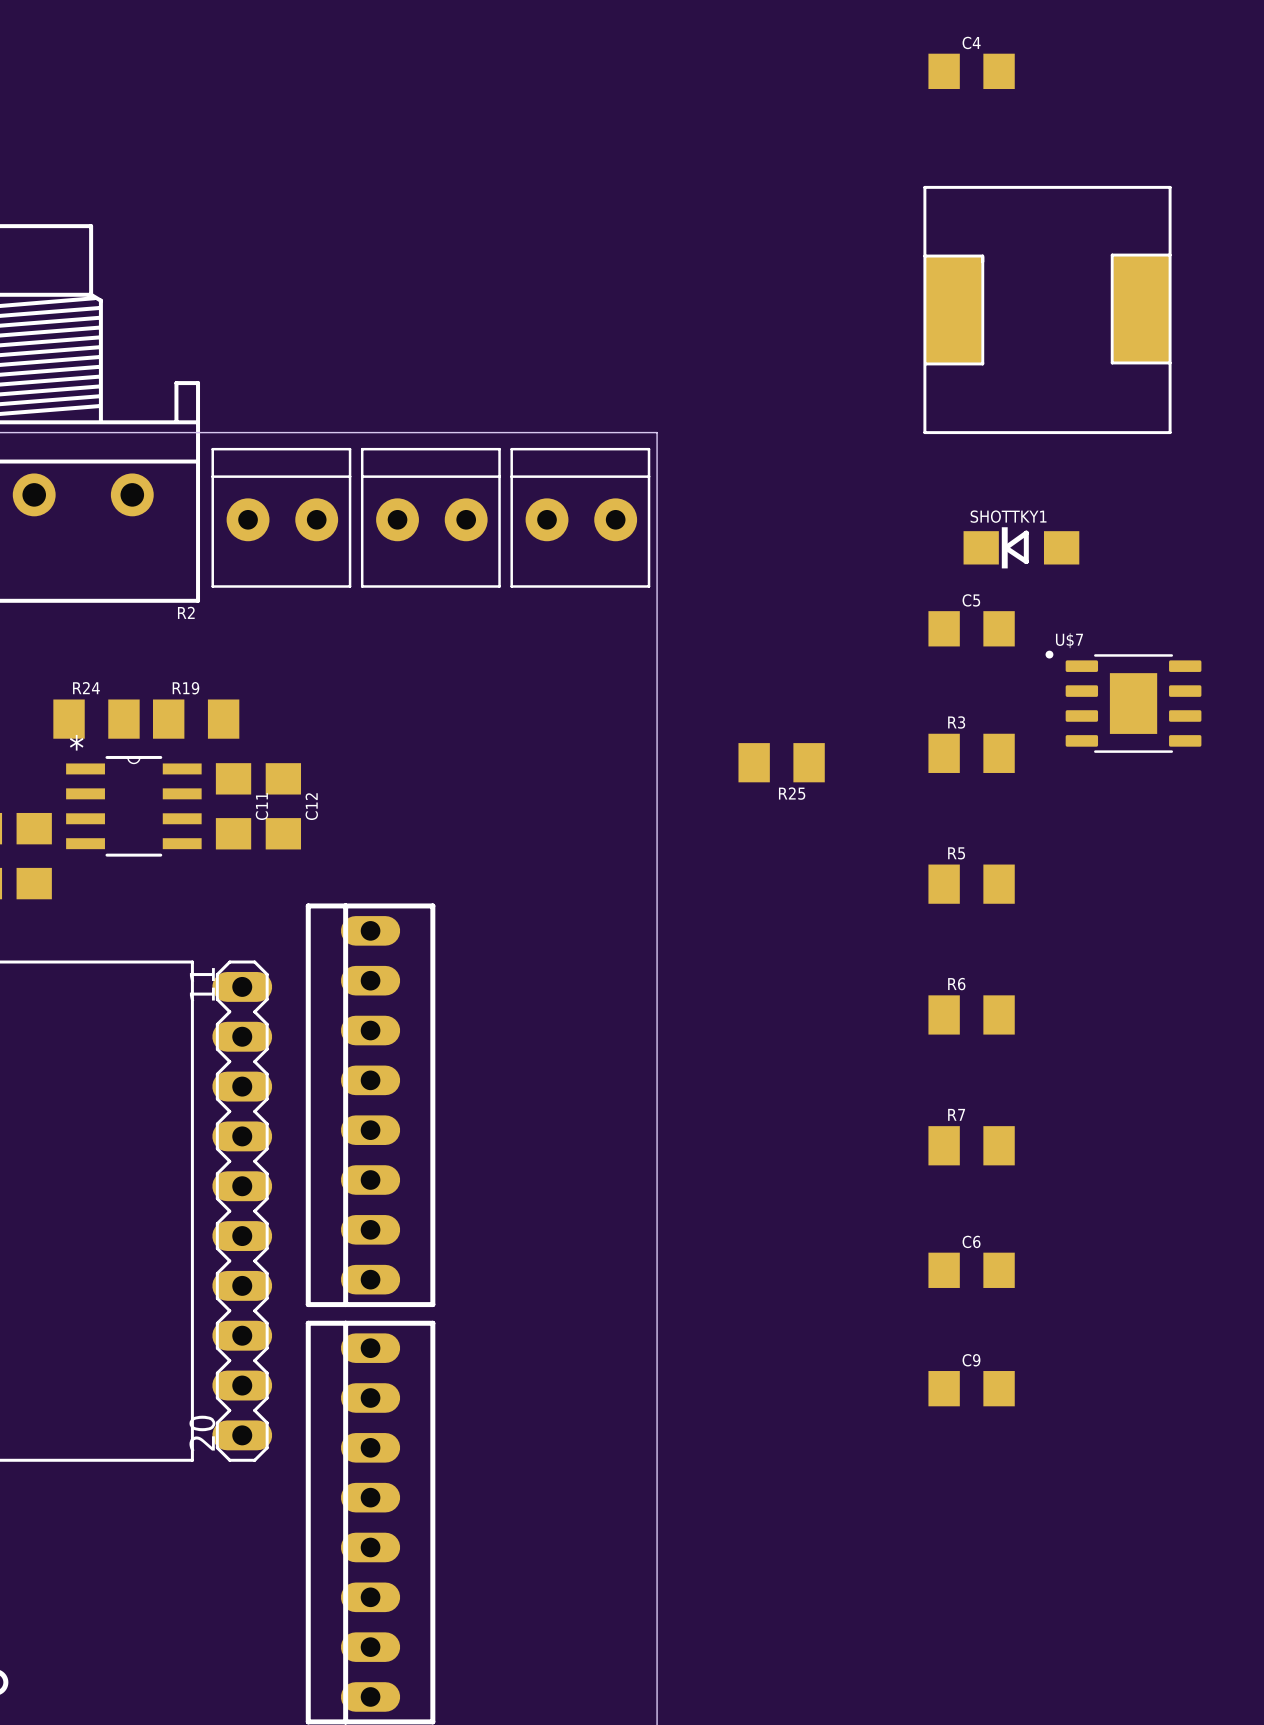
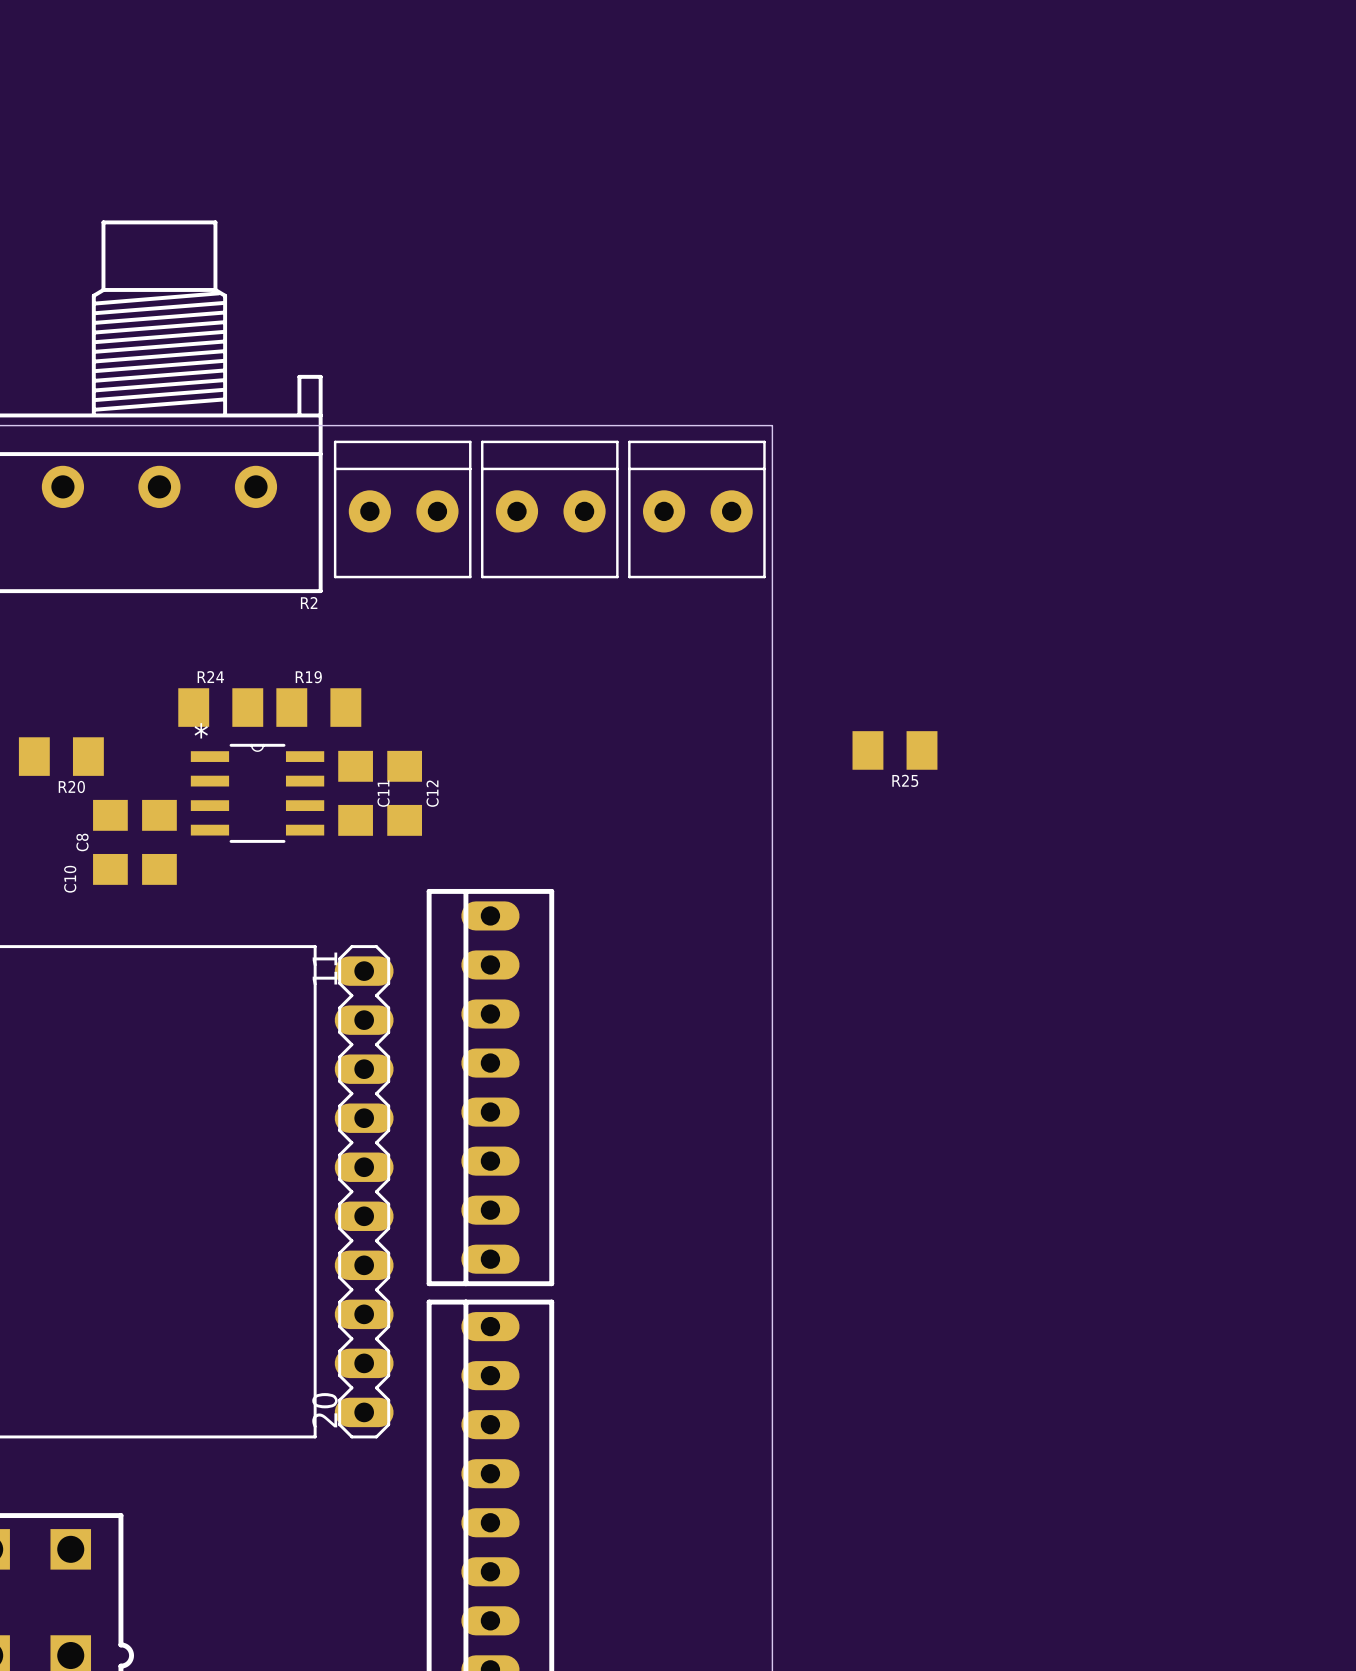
C4: (971, 71) -> none
part: (1047, 309) -> none
SHOTTKY1: (1021, 547) -> none
C5: (971, 628) -> none
U$7: (1123, 701) -> none
R3: (971, 753) -> none
R5: (971, 884) -> none
R6: (971, 1014) -> none
R7: (971, 1145) -> none
C6: (971, 1270) -> none
C9: (971, 1388) -> none

